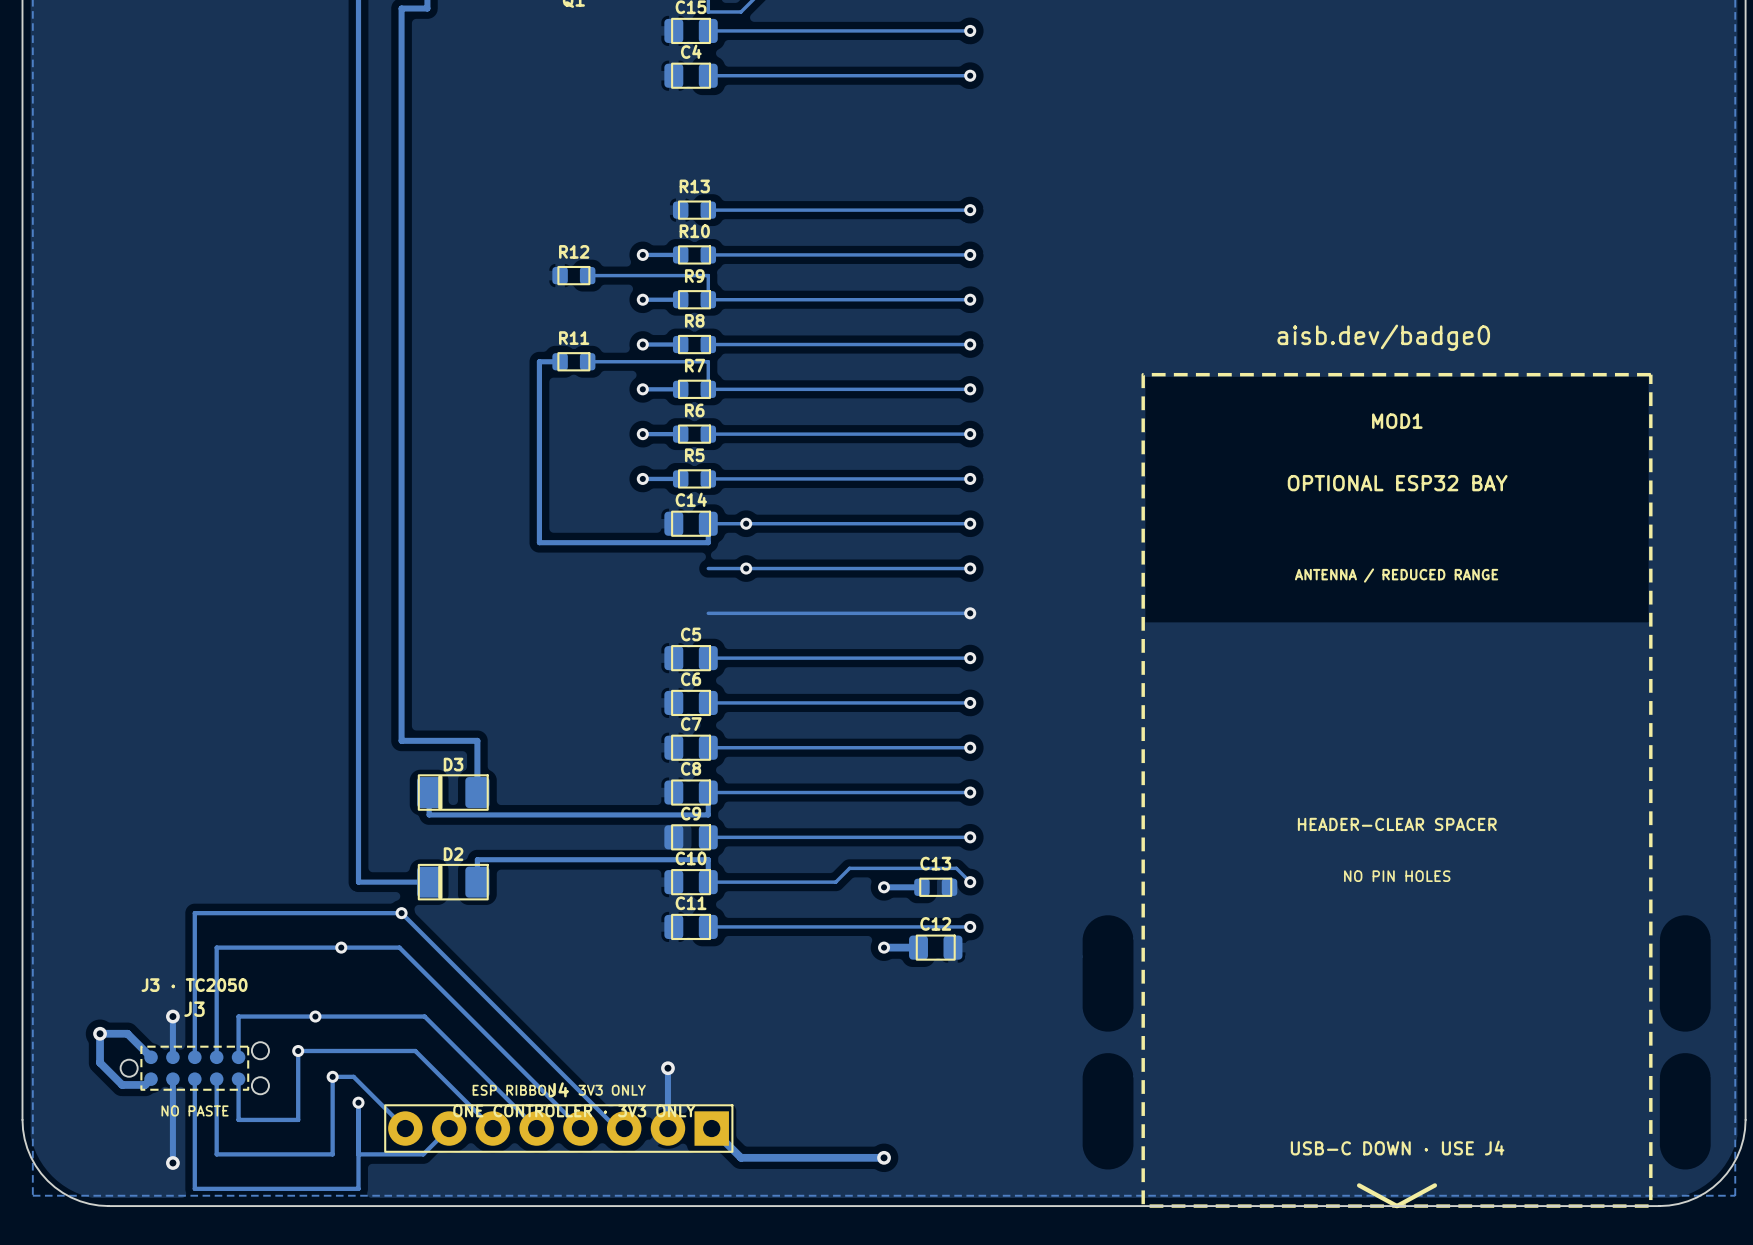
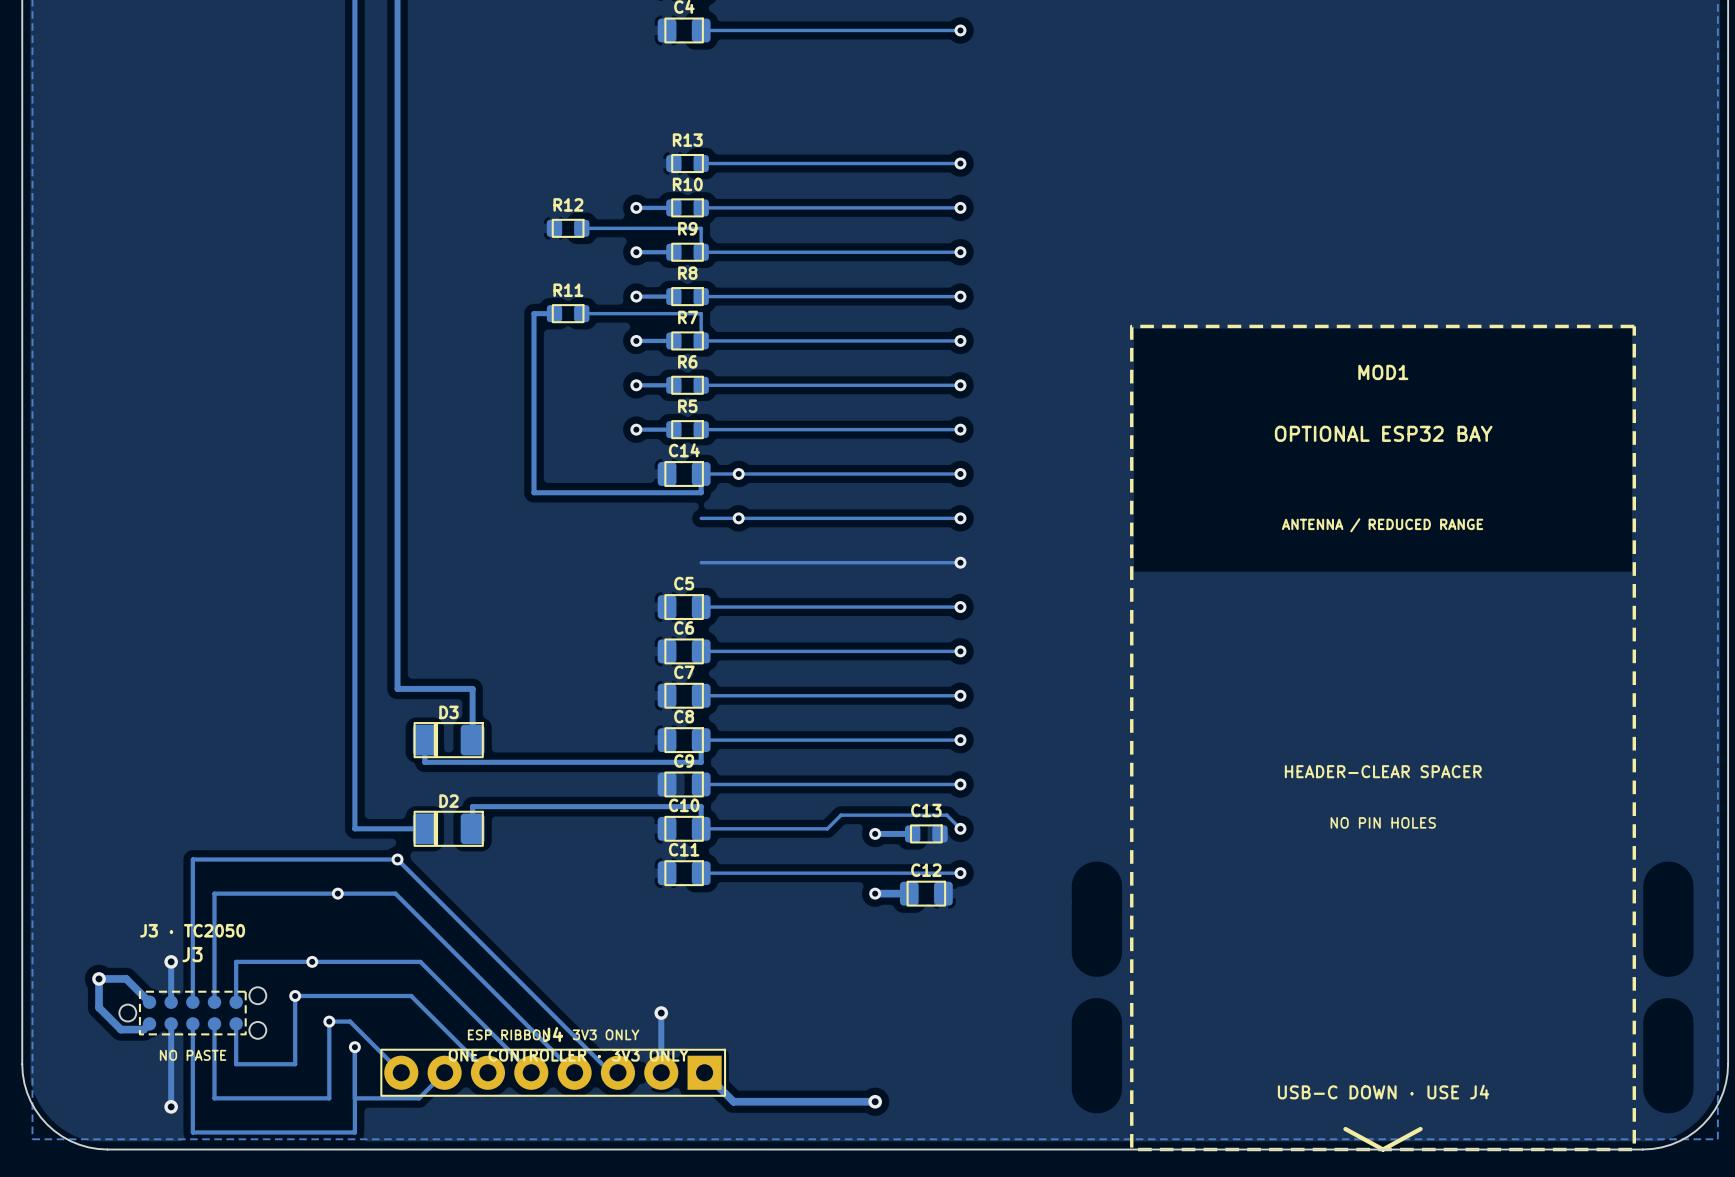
text: aisb.dev/badge0 (1383, 337) -> none

